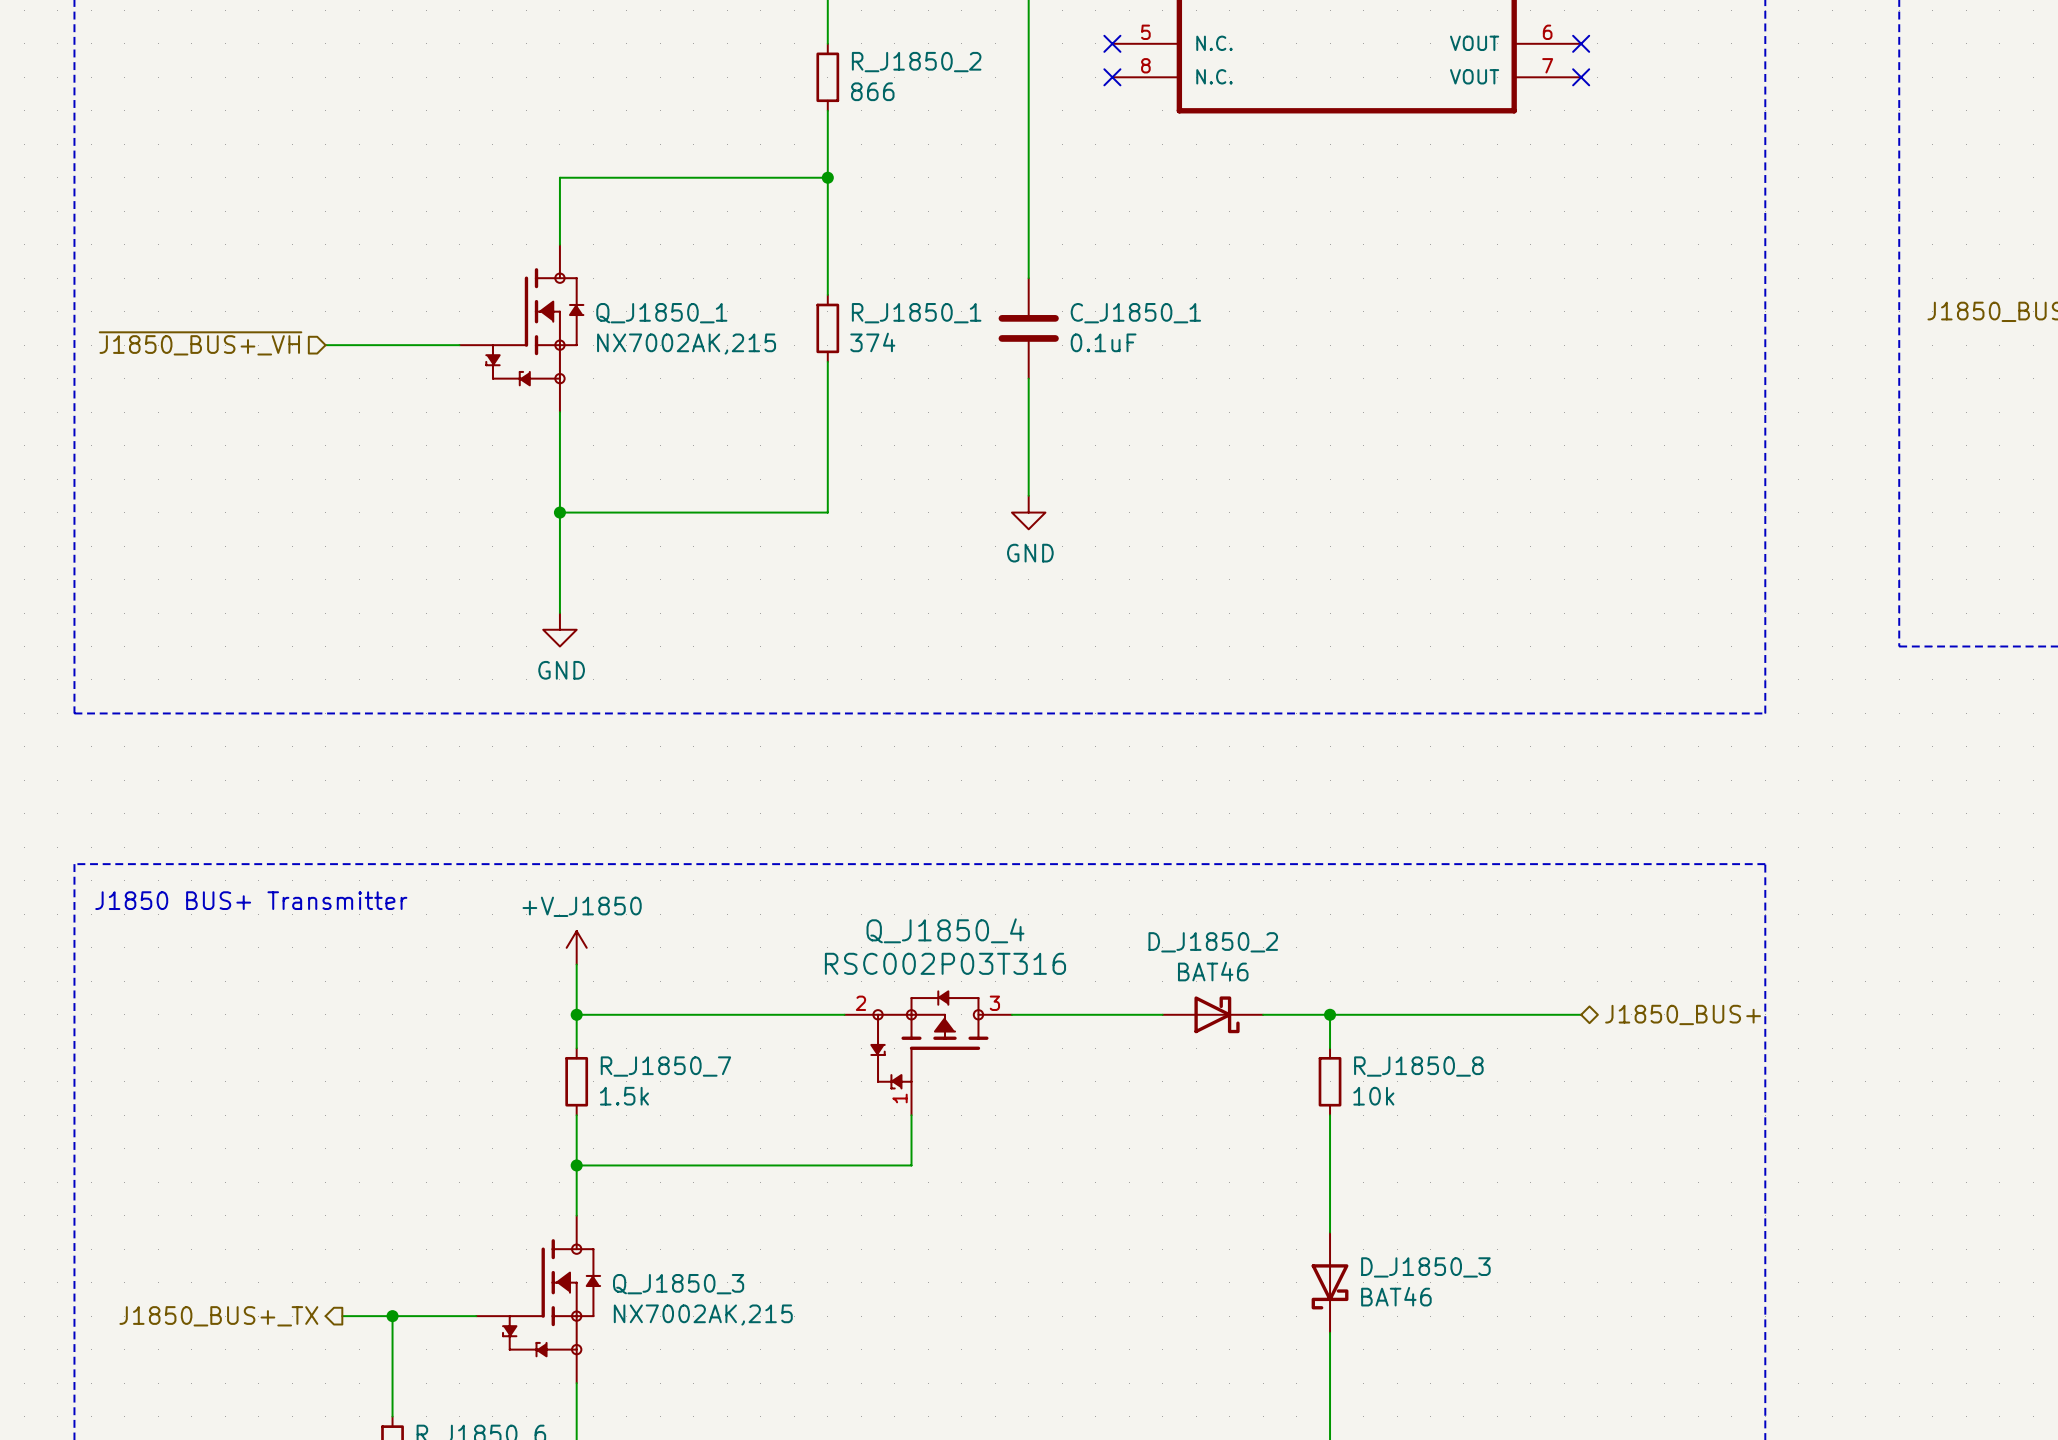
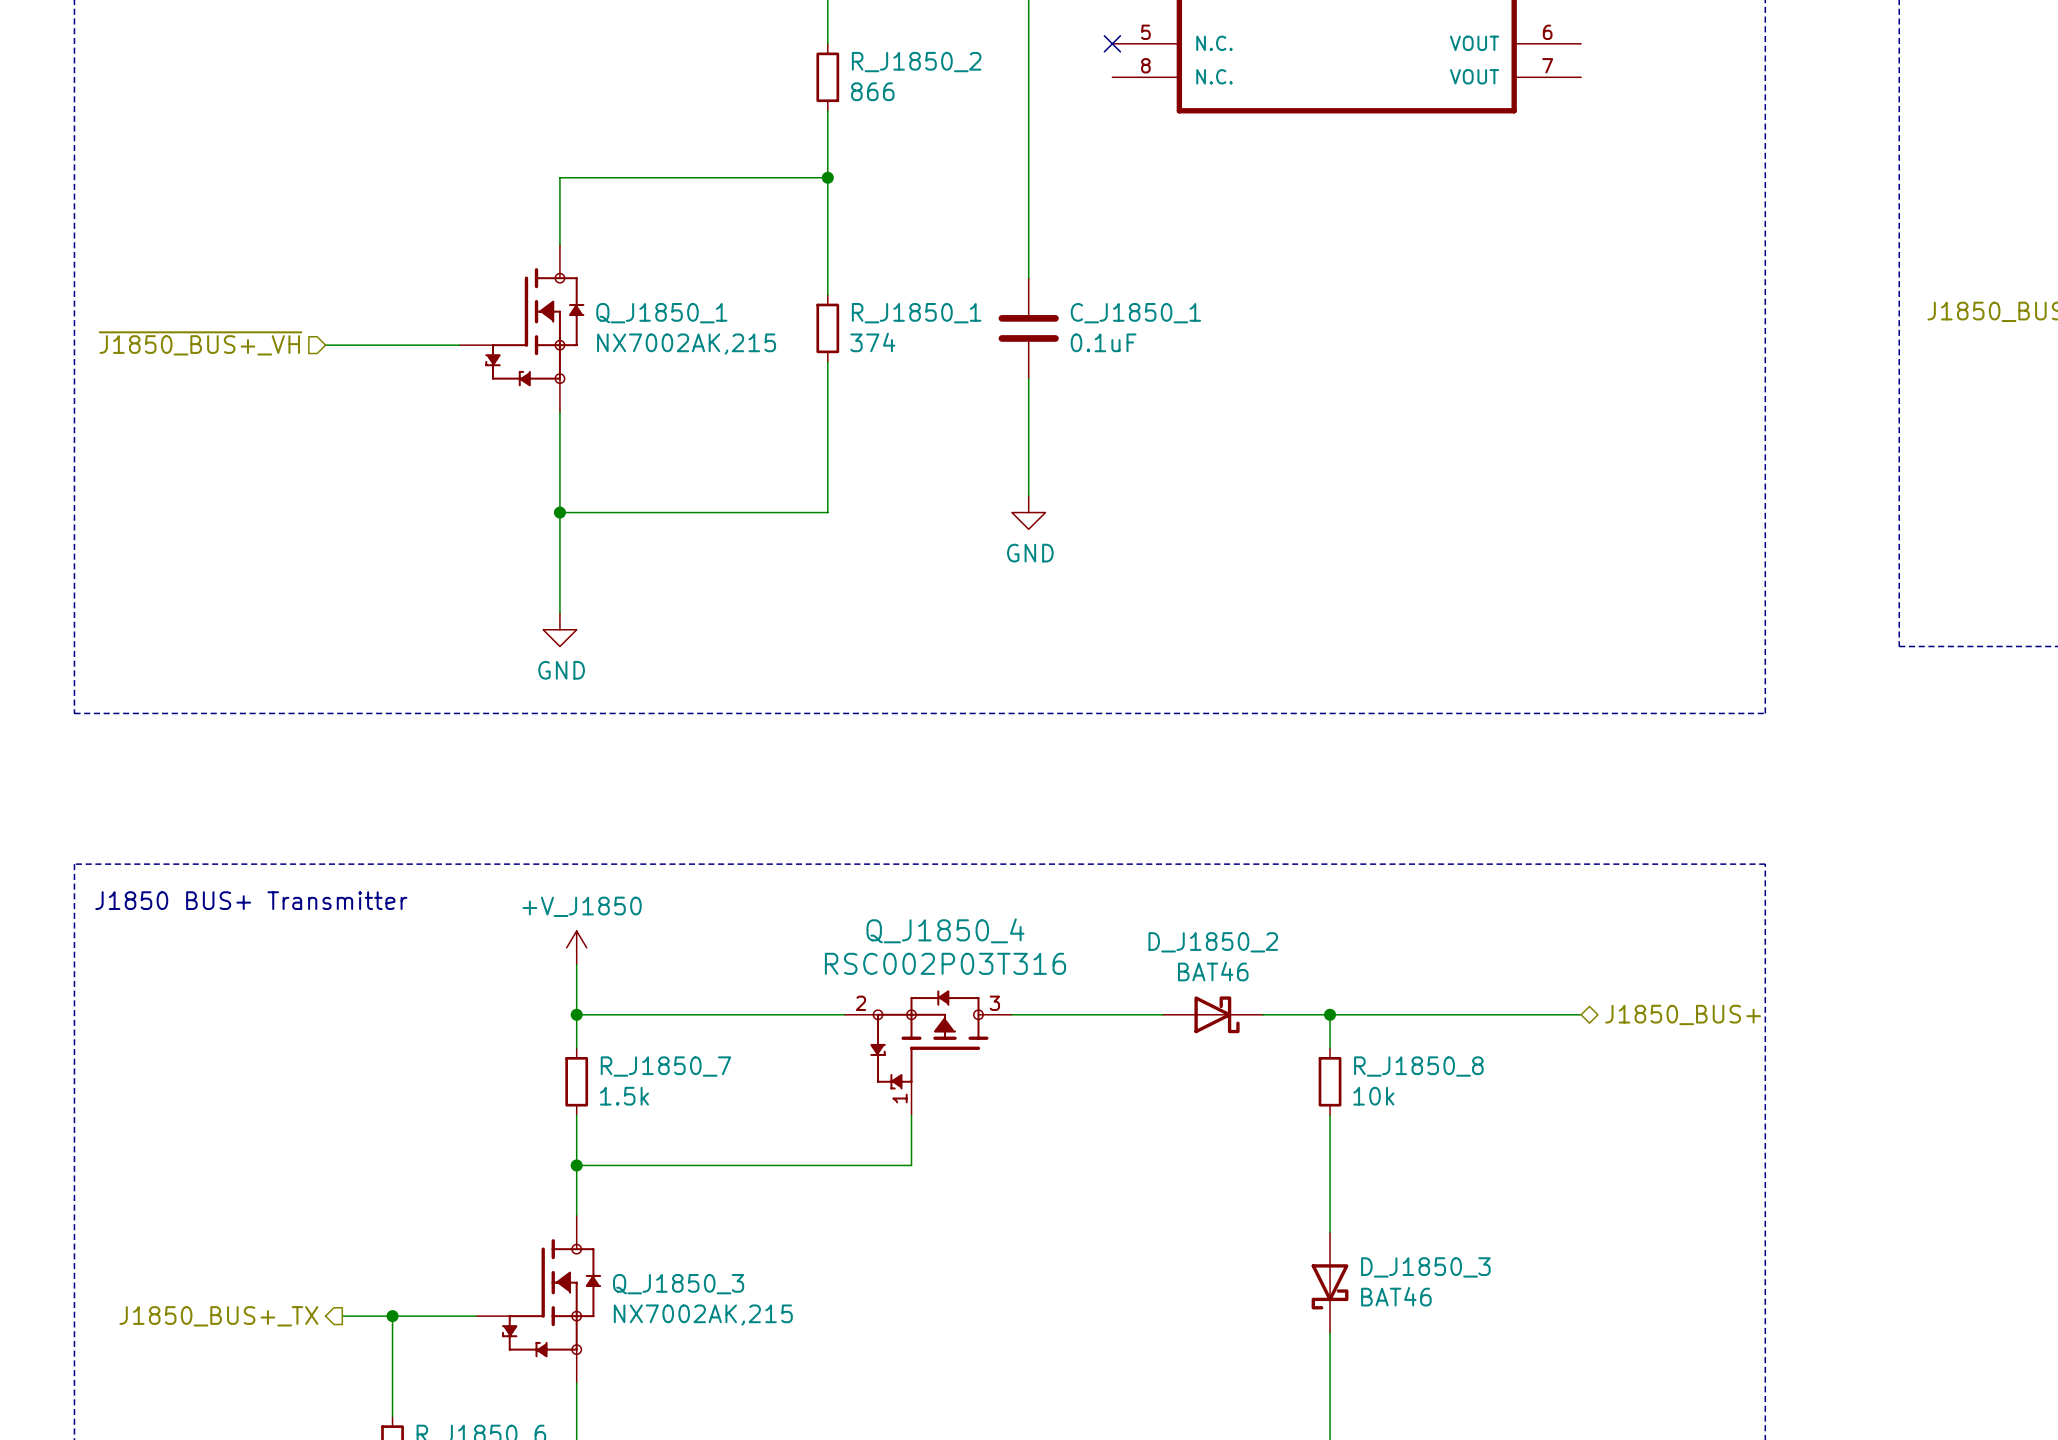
no-connect mark: (1581, 43) -> none
no-connect mark: (1112, 77) -> none
no-connect mark: (1581, 77) -> none

